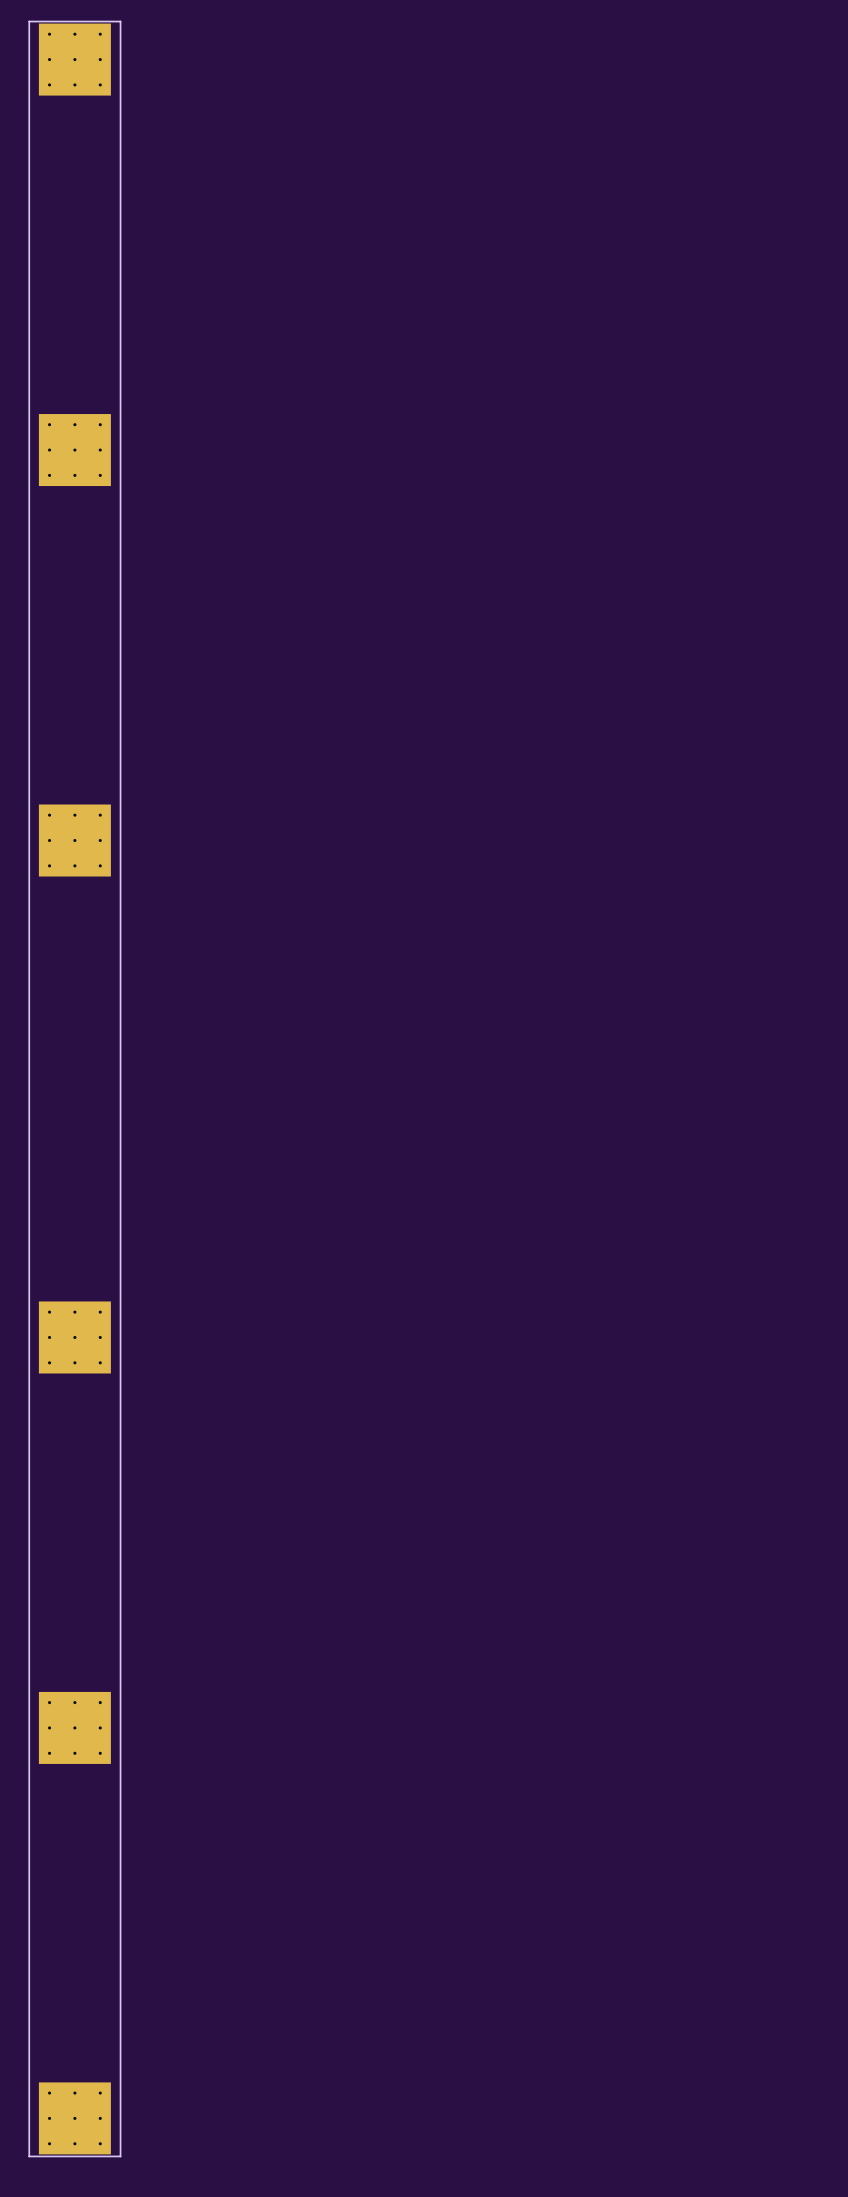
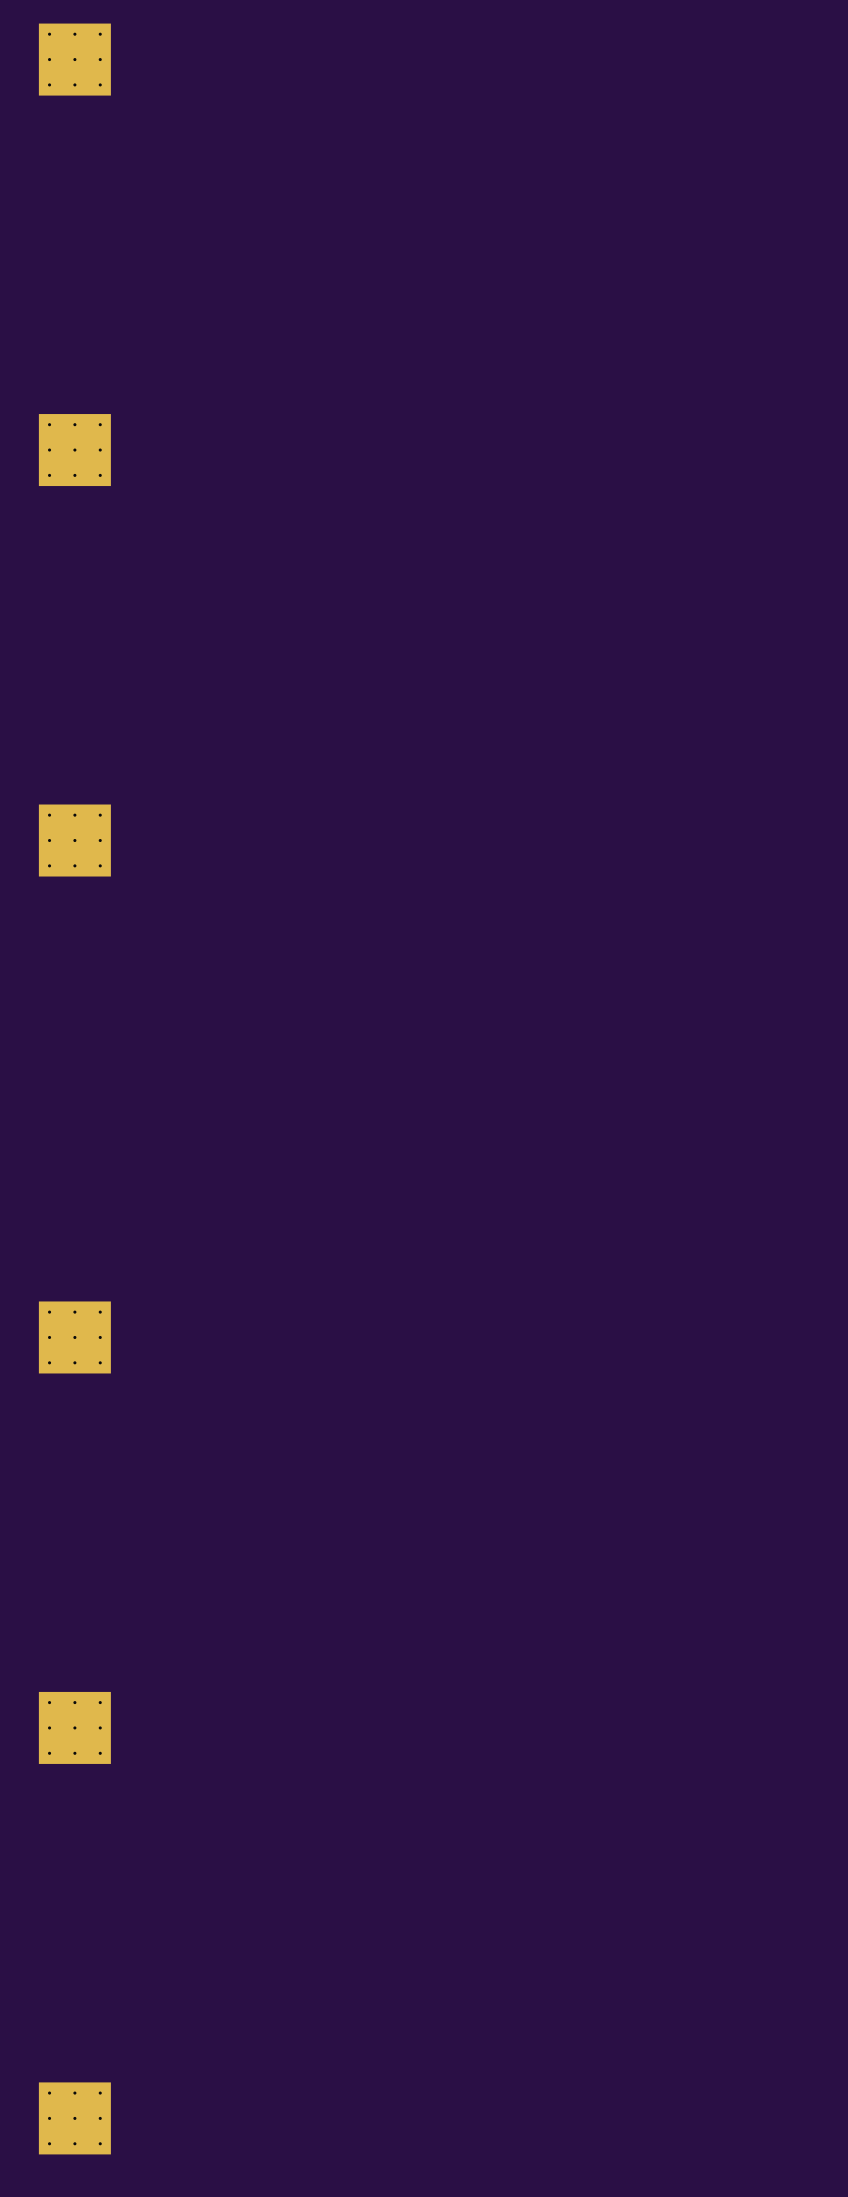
board edge: (29, 21) (120, 21) (120, 2156) (29, 2156) (29, 21) -> none

